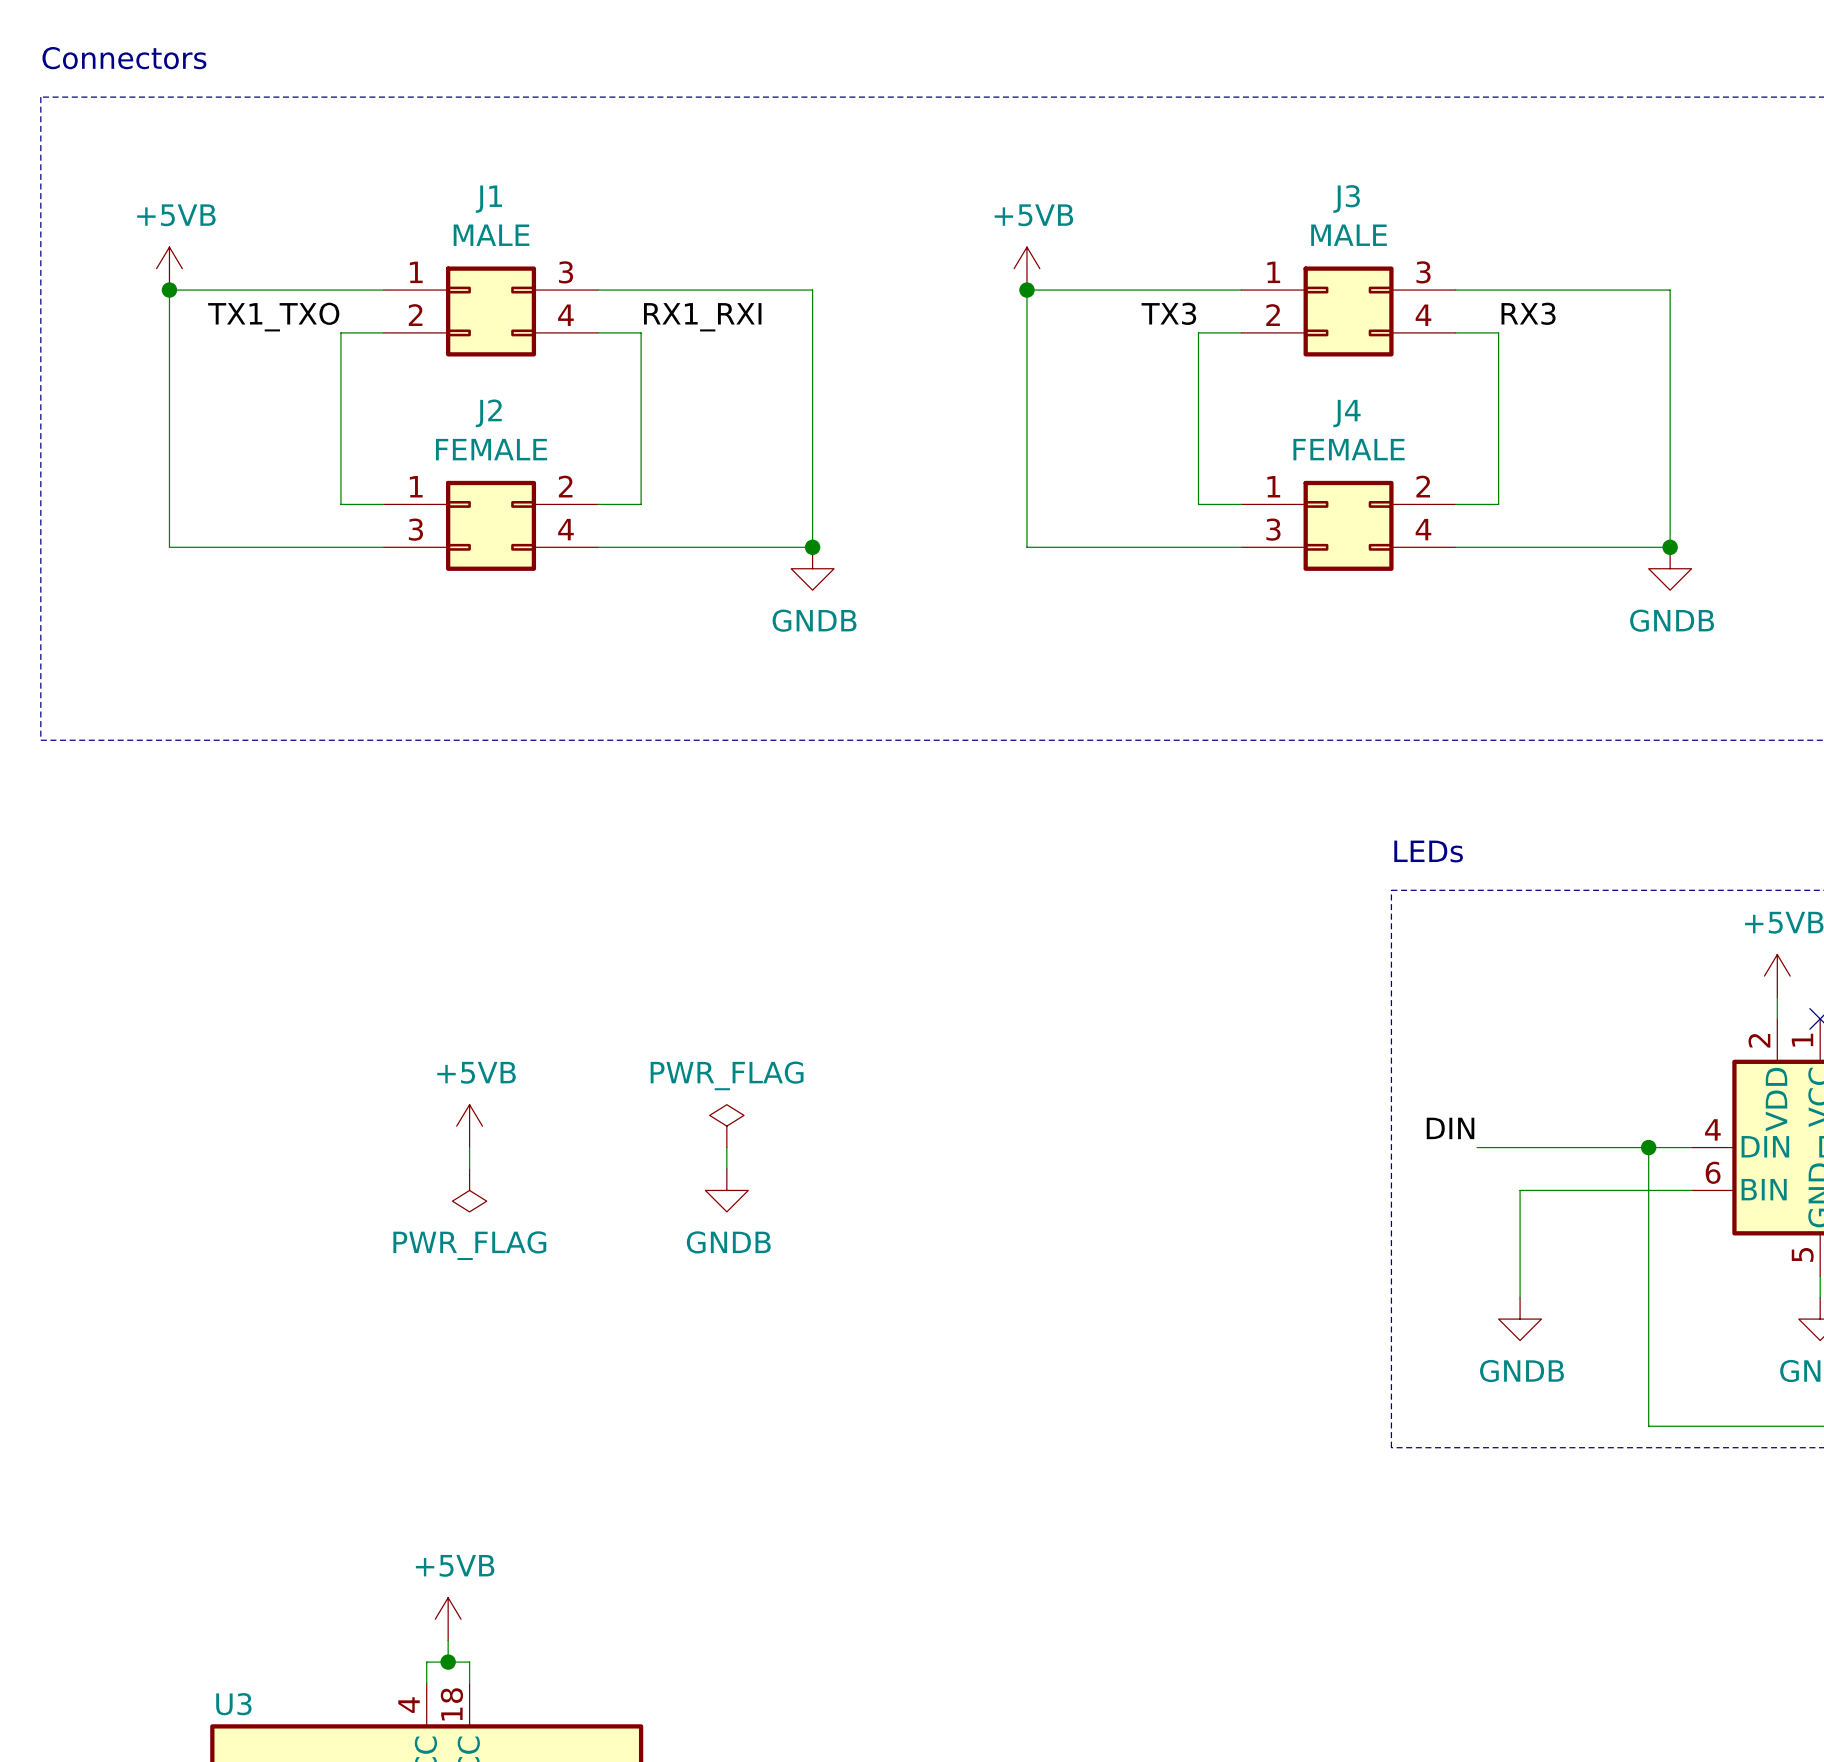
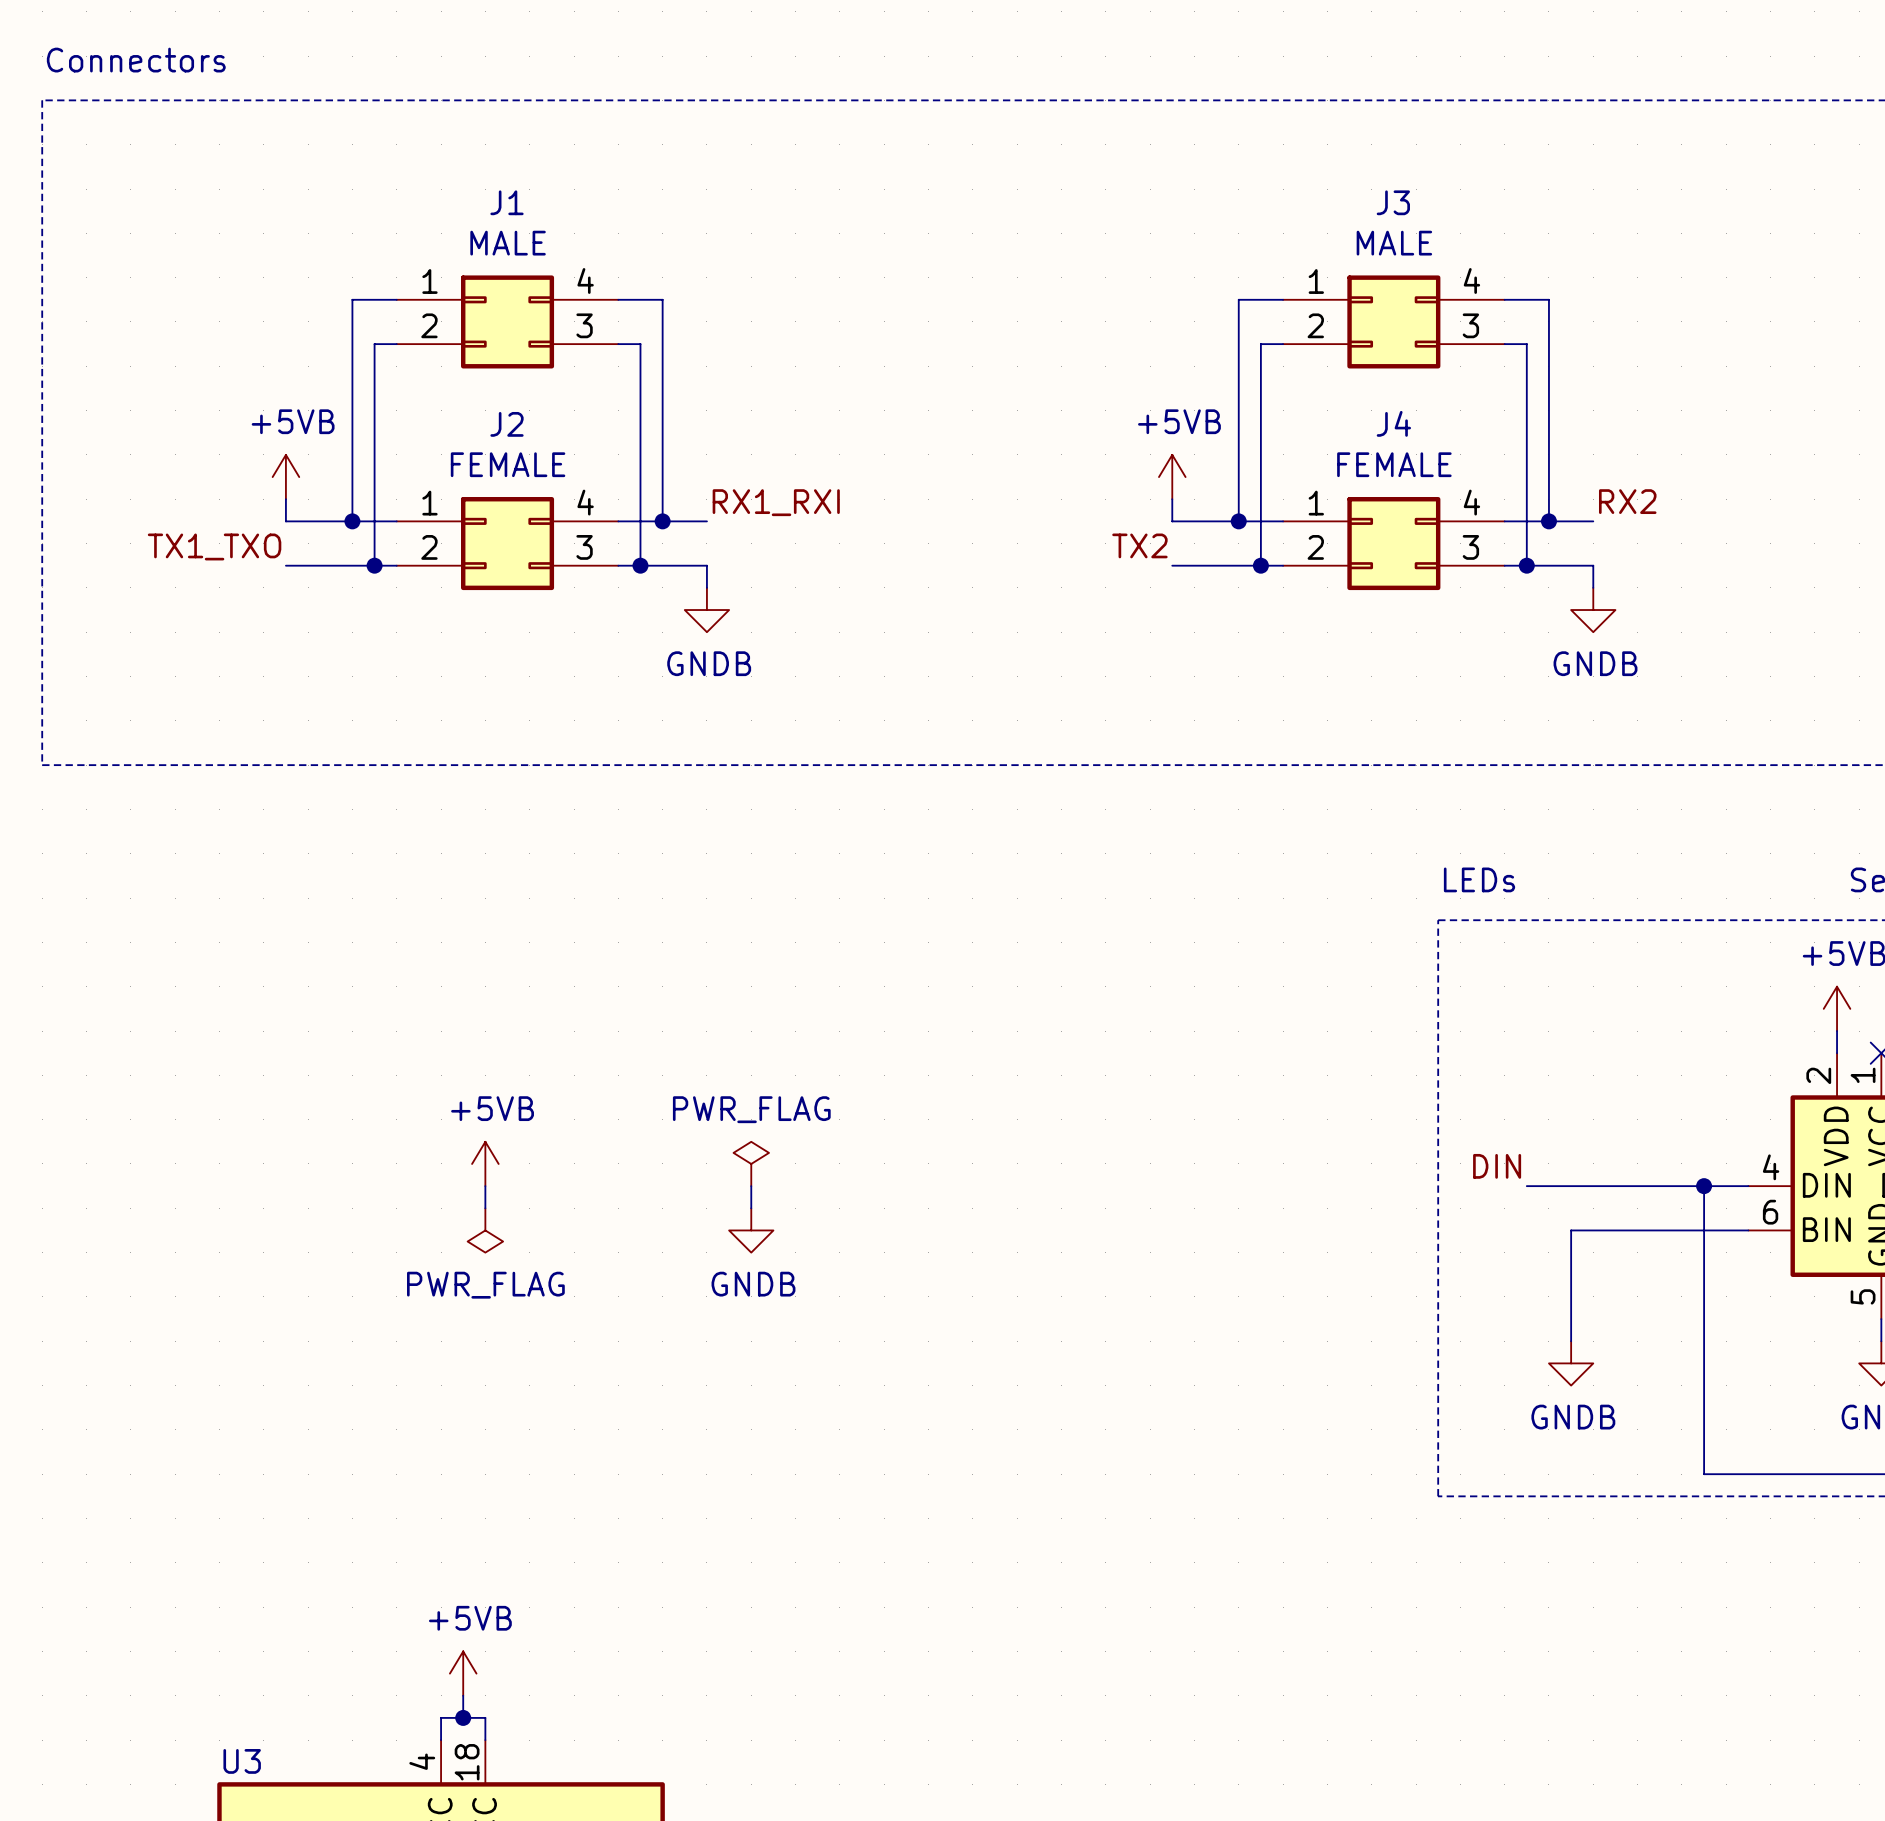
power symbol position: +5VB (169, 268) -> +5VB (285, 477)
power symbol position: +5VB (1026, 268) -> +5VB (1172, 477)
J1 pin number: 3 (566, 272) -> 4 (585, 280)
J3 pin number: 3 (1423, 272) -> 4 (1471, 280)
junction: (169, 290) -> none
wire: (340, 290) (169, 290) (169, 547) (276, 547) -> none
wire: (641, 290) (812, 290) (812, 547) (683, 547) -> (706, 587) (706, 565)
junction: (1026, 290) -> none
wire: (1198, 290) (1026, 290) (1026, 547) (1134, 547) -> none
wire: (1498, 290) (1670, 290) (1670, 547) (1541, 547) -> (1593, 587) (1593, 565)
label: TX3 (1168, 313) -> none
label: RX3 (1528, 313) -> none
J1 pin number: 4 (565, 315) -> 3 (584, 325)
J3 pin number: 4 (1423, 315) -> 3 (1470, 325)
label position: TX1_TXO (273, 317) -> TX1_TXO (214, 546)
label position: RX1_RXI (702, 317) -> RX1_RXI (776, 502)
wire: (340, 332) (362, 332) -> (352, 344) (352, 299)
wire: none -> (374, 344) (374, 565)
wire: (619, 332) (641, 332) -> (662, 299) (662, 344)
wire: none -> (640, 344) (640, 565)
wire: (1198, 332) (1219, 332) -> (1238, 344) (1238, 299)
wire: none -> (1260, 344) (1260, 565)
wire: (1477, 332) (1498, 332) -> (1548, 299) (1548, 344)
wire: none -> (1526, 344) (1526, 565)
wire: none -> (285, 499) (285, 521) (352, 521)
wire: none -> (1172, 499) (1172, 521) (1238, 521)
label: none -> RX2 (1627, 501)
J2 pin number: 2 (565, 486) -> 4 (585, 502)
J4 pin number: 2 (1423, 486) -> 4 (1471, 502)
junction: none -> (352, 521)
wire: none -> (662, 521) (706, 521)
junction: none -> (662, 521)
junction: none -> (1238, 521)
wire: none -> (1548, 521) (1593, 521)
junction: none -> (1548, 521)
label: none -> TX2 (1139, 545)
J2 pin number: 3 (415, 529) -> 2 (429, 547)
J2 pin number: 4 (565, 529) -> 3 (584, 547)
J4 pin number: 3 (1273, 529) -> 2 (1315, 547)
J4 pin number: 4 (1423, 529) -> 3 (1470, 547)
junction: none -> (374, 565)
junction: none -> (640, 565)
junction: (812, 547) -> none
junction: none -> (1260, 565)
junction: none -> (1526, 565)
junction: (1670, 547) -> none
power symbol position: GNDB (812, 568) -> GNDB (706, 610)
power symbol position: GNDB (1670, 568) -> GNDB (1593, 610)

